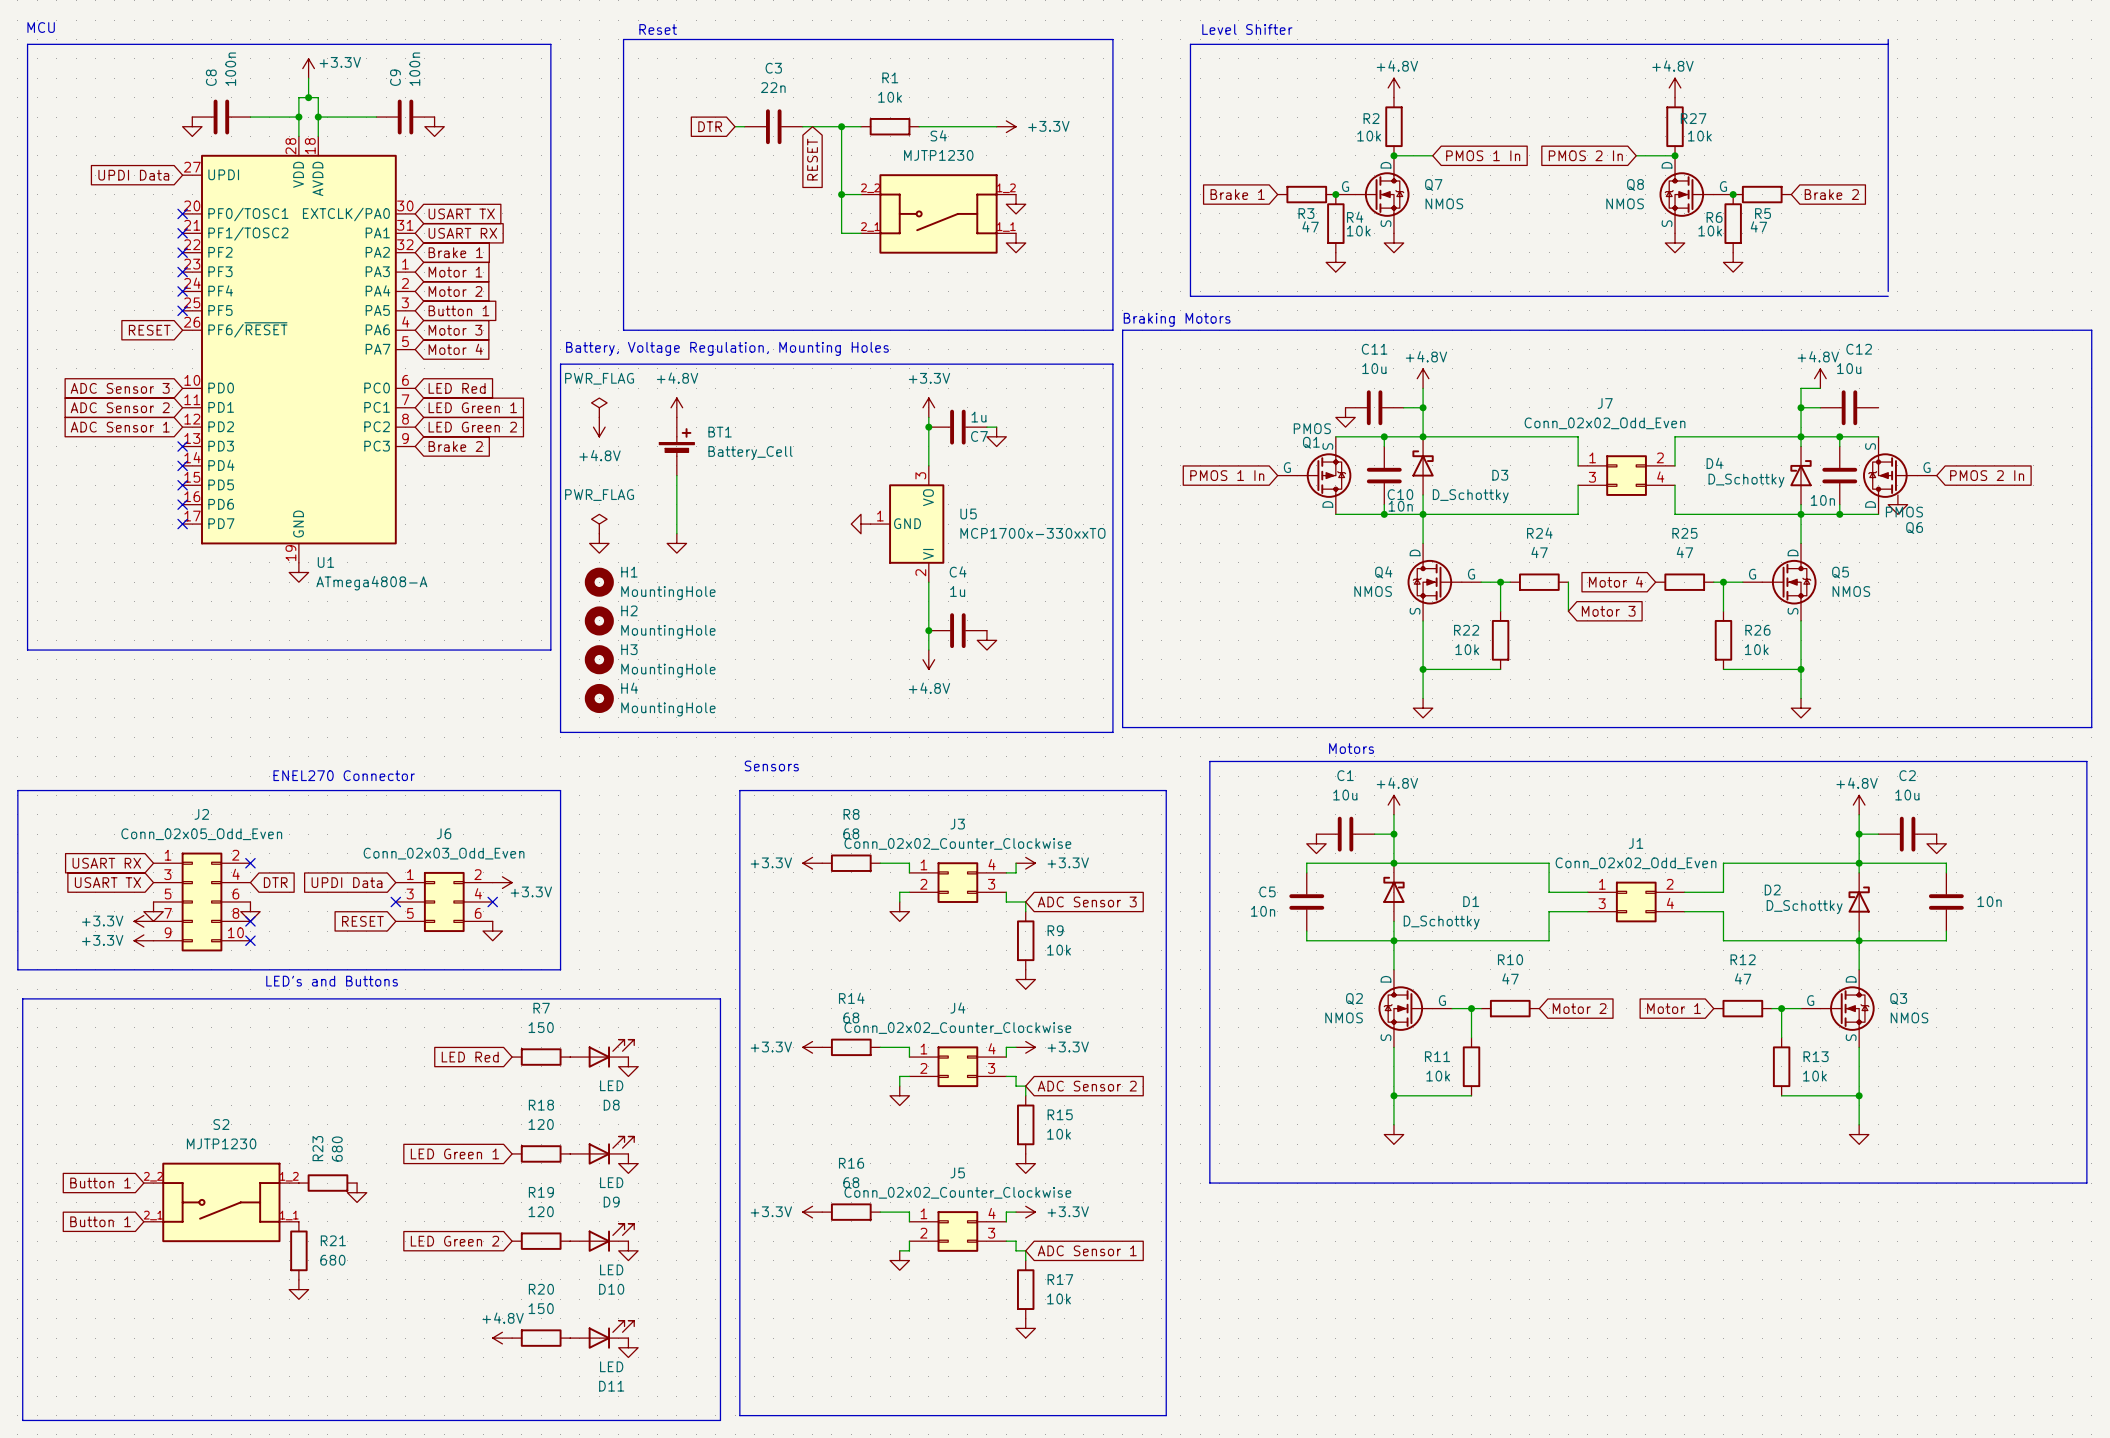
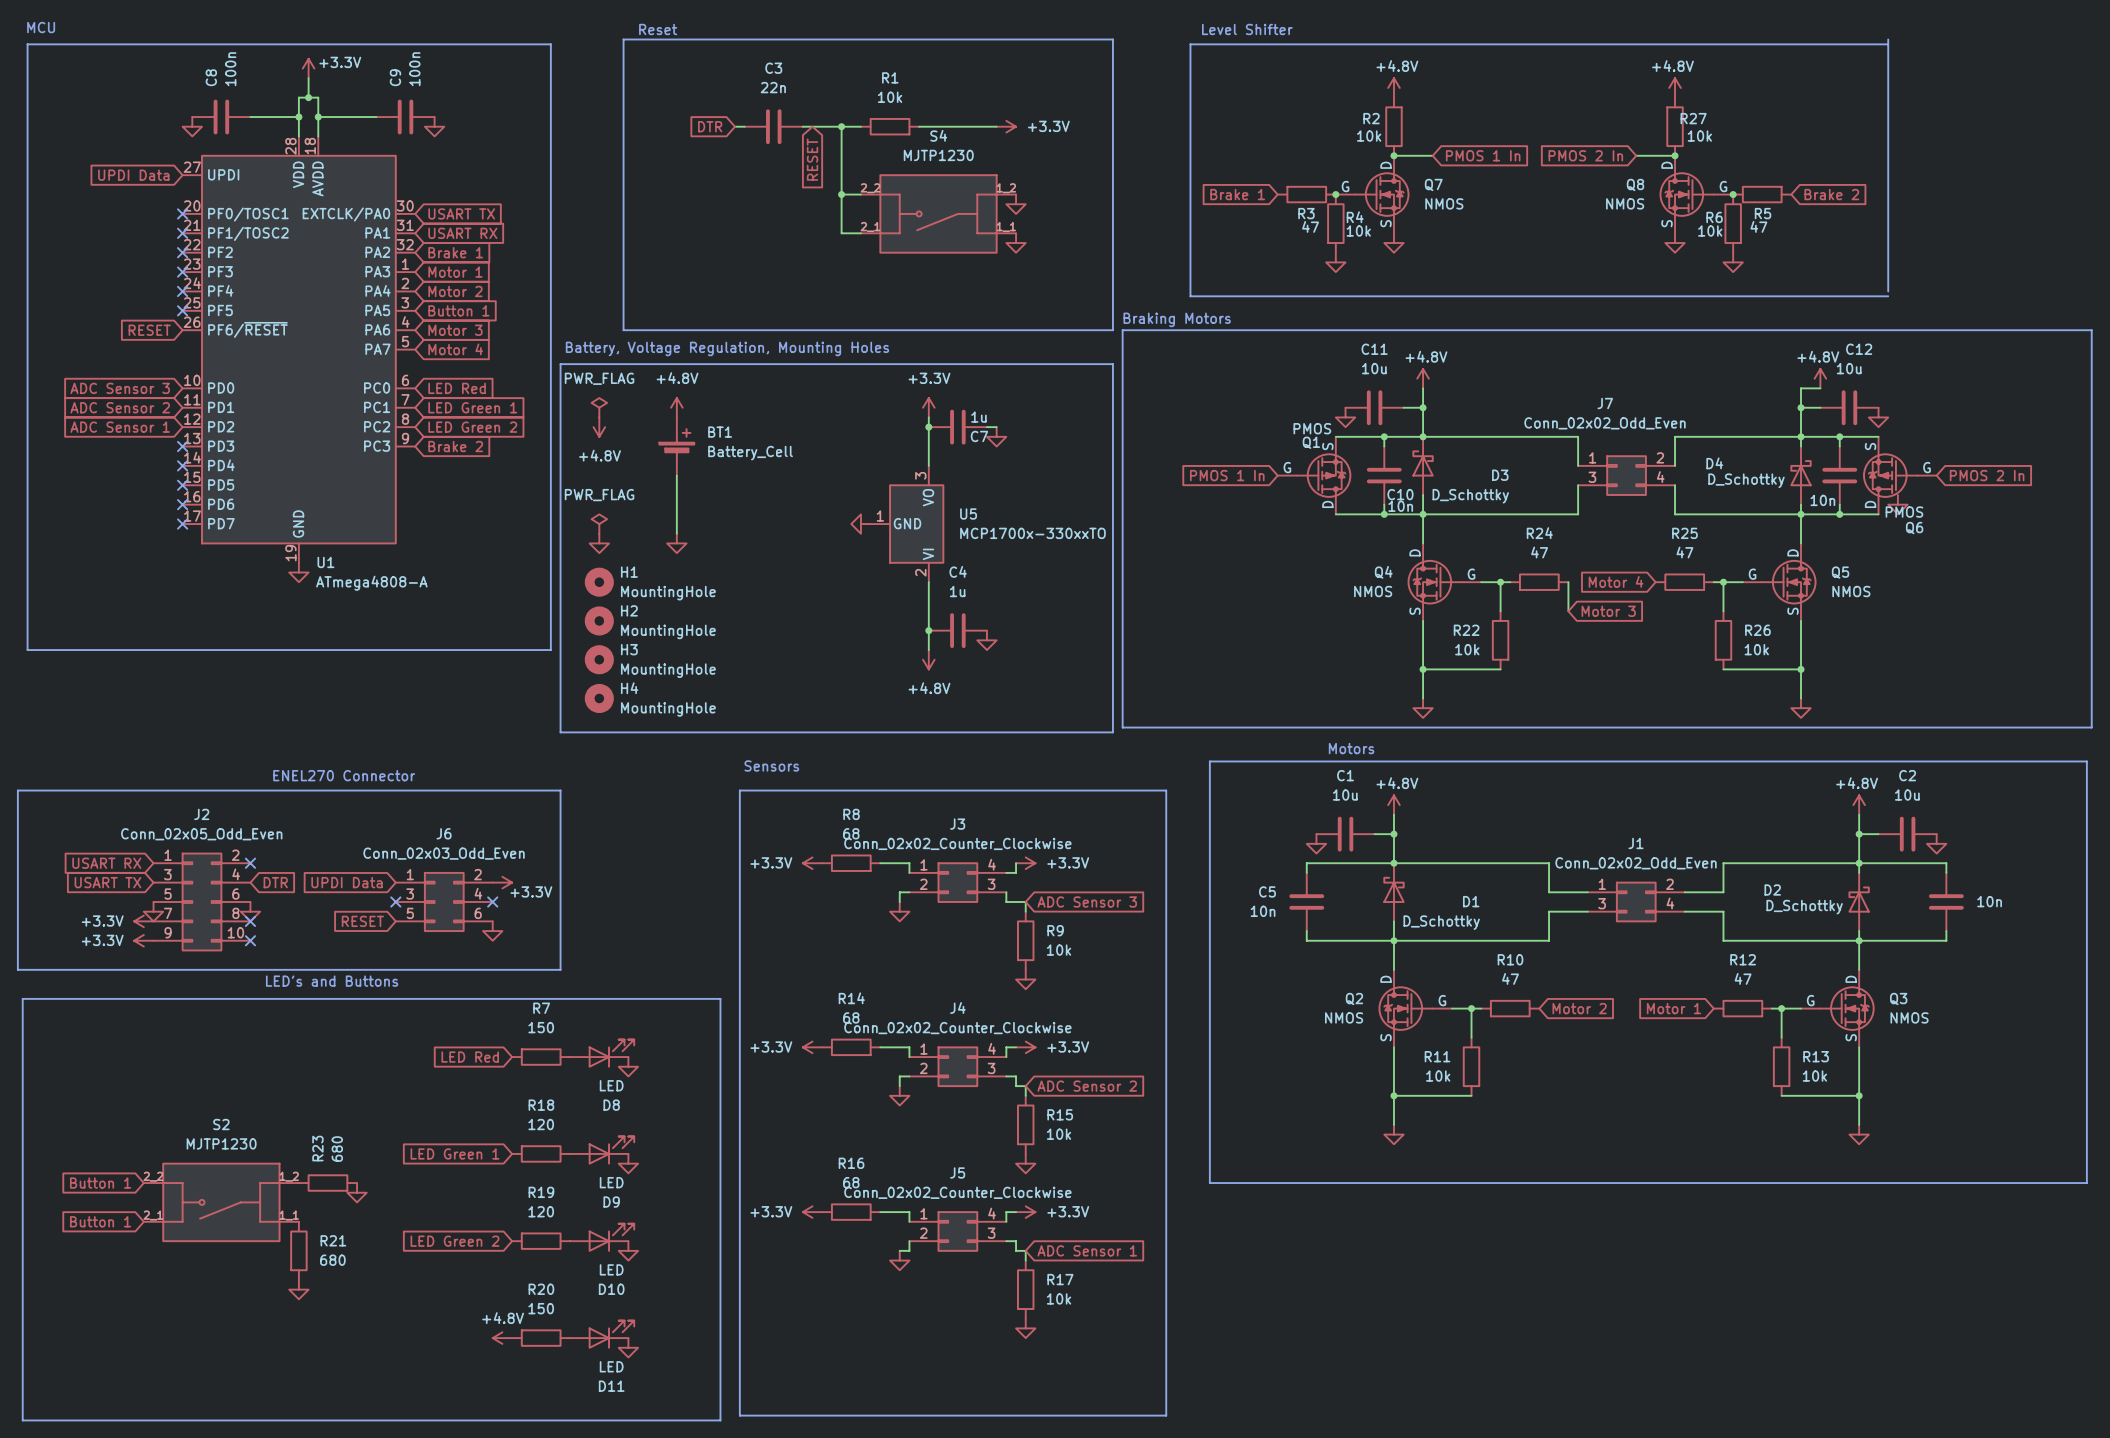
power symbol: none -> (1878, 417)

